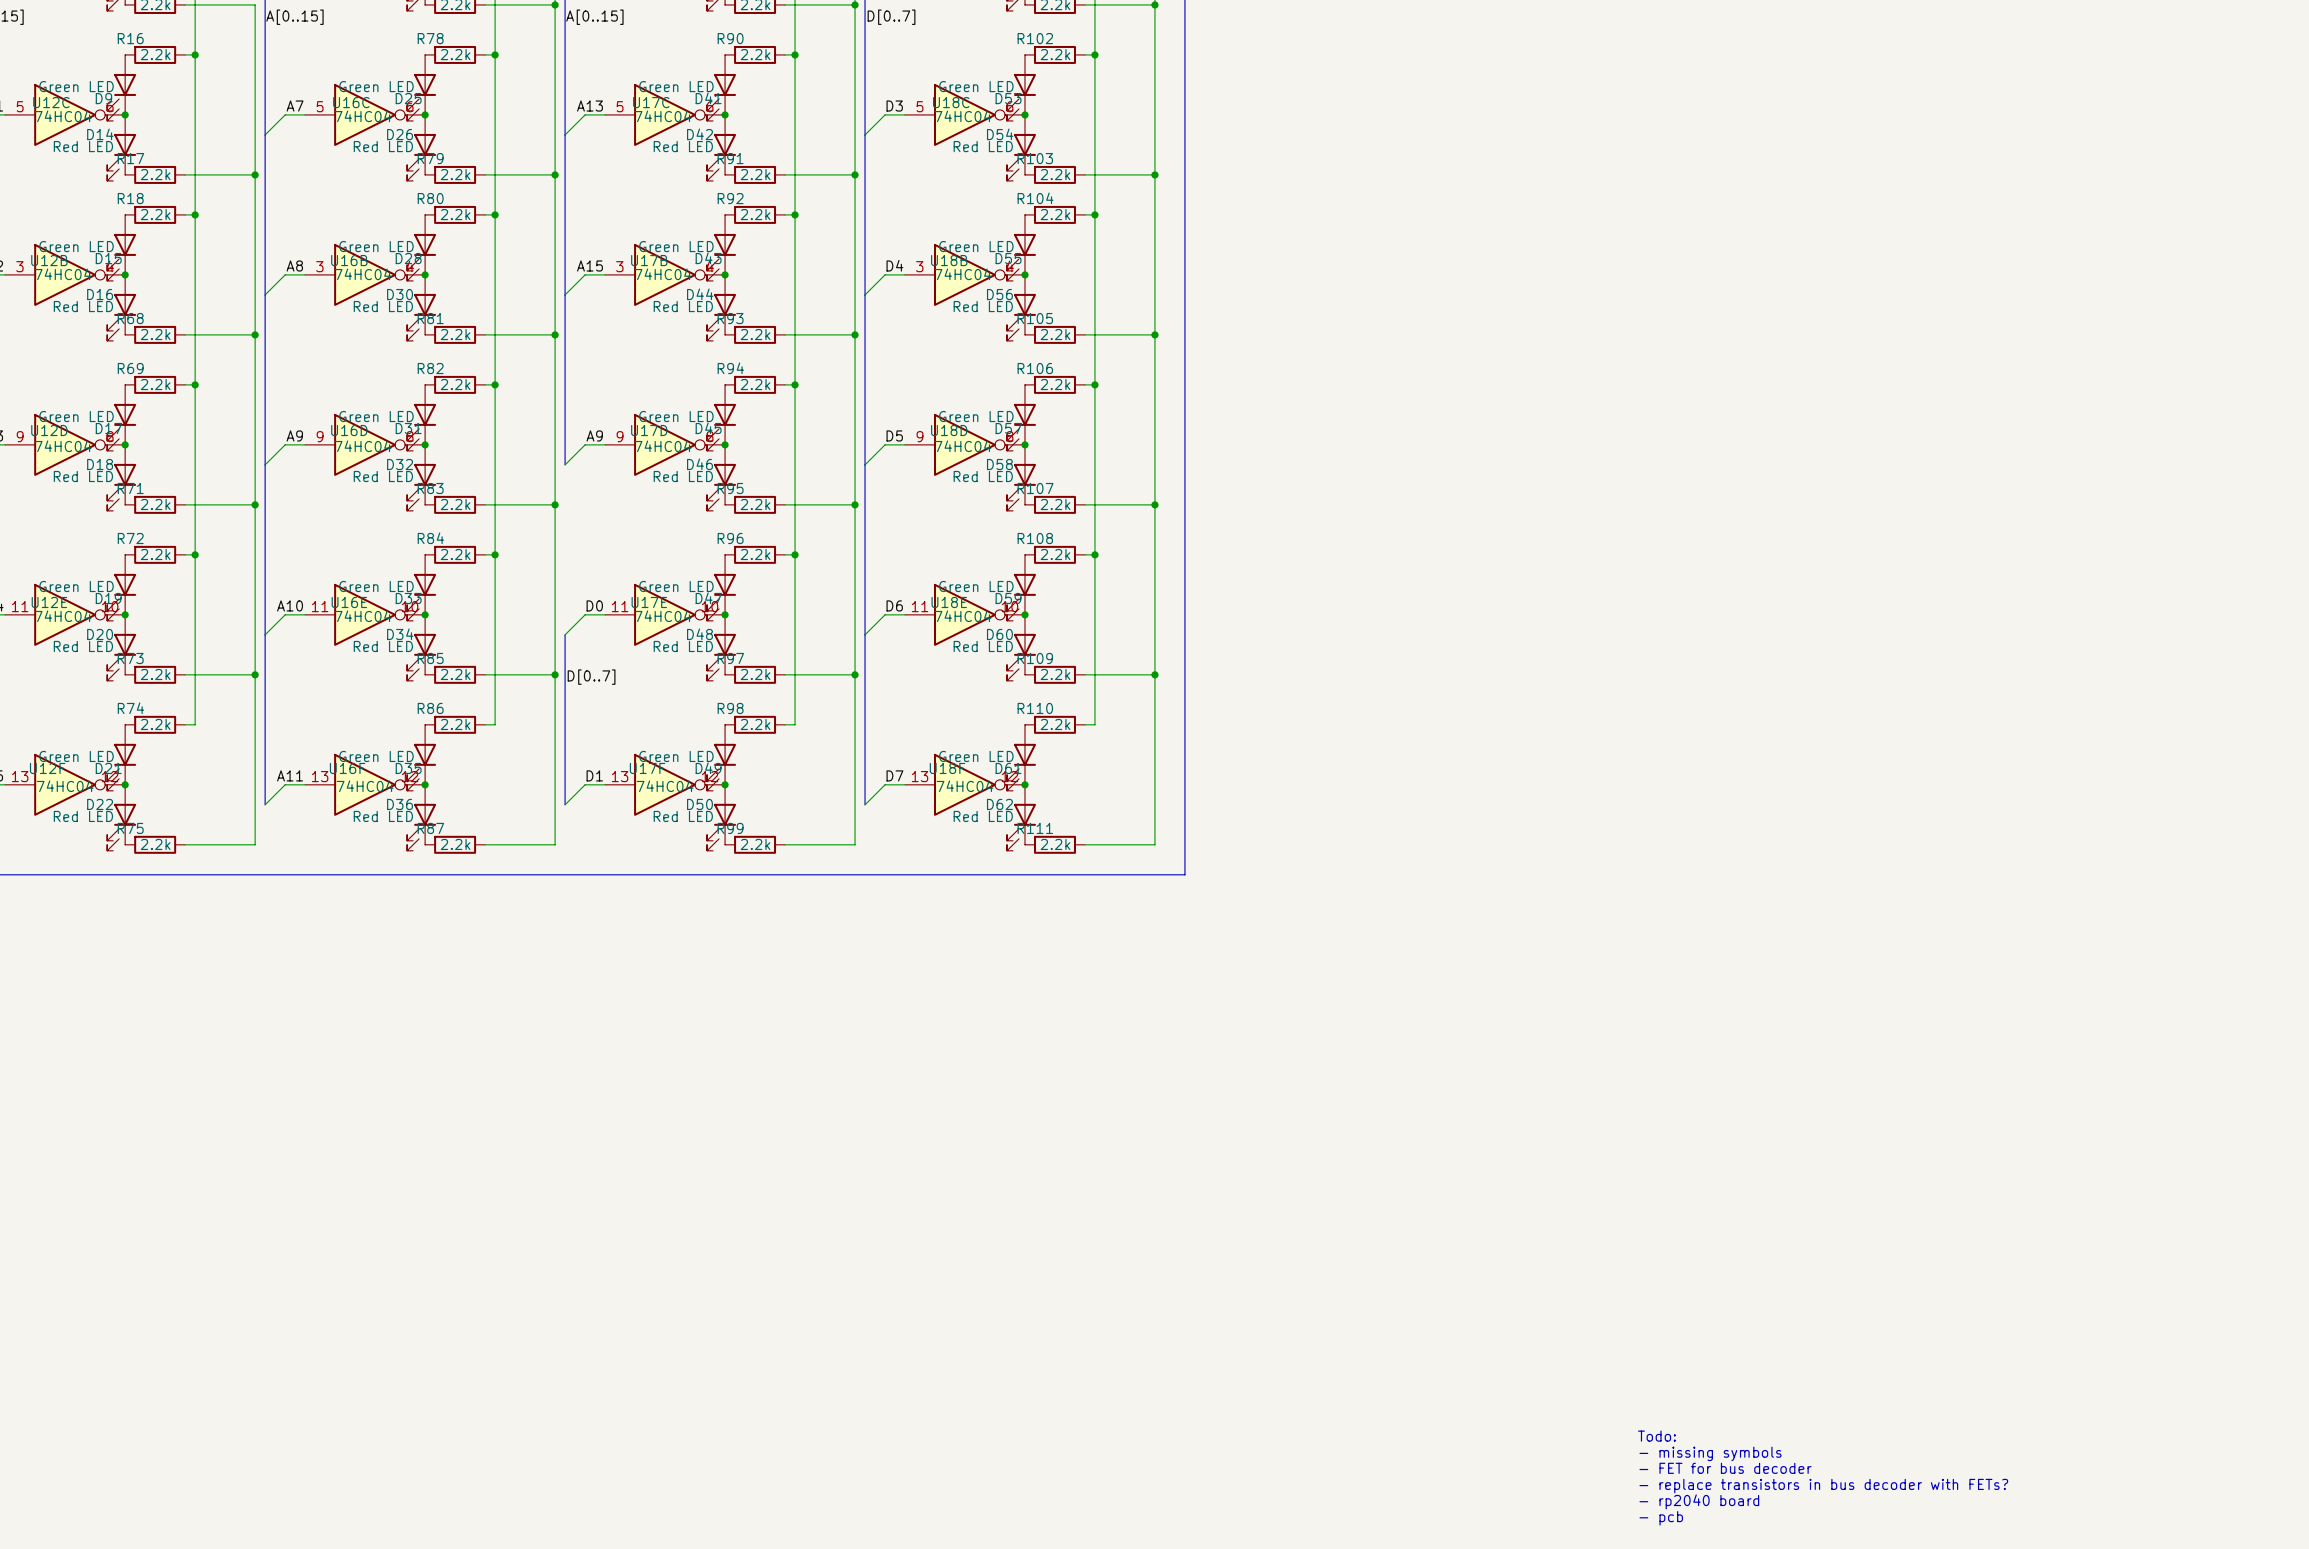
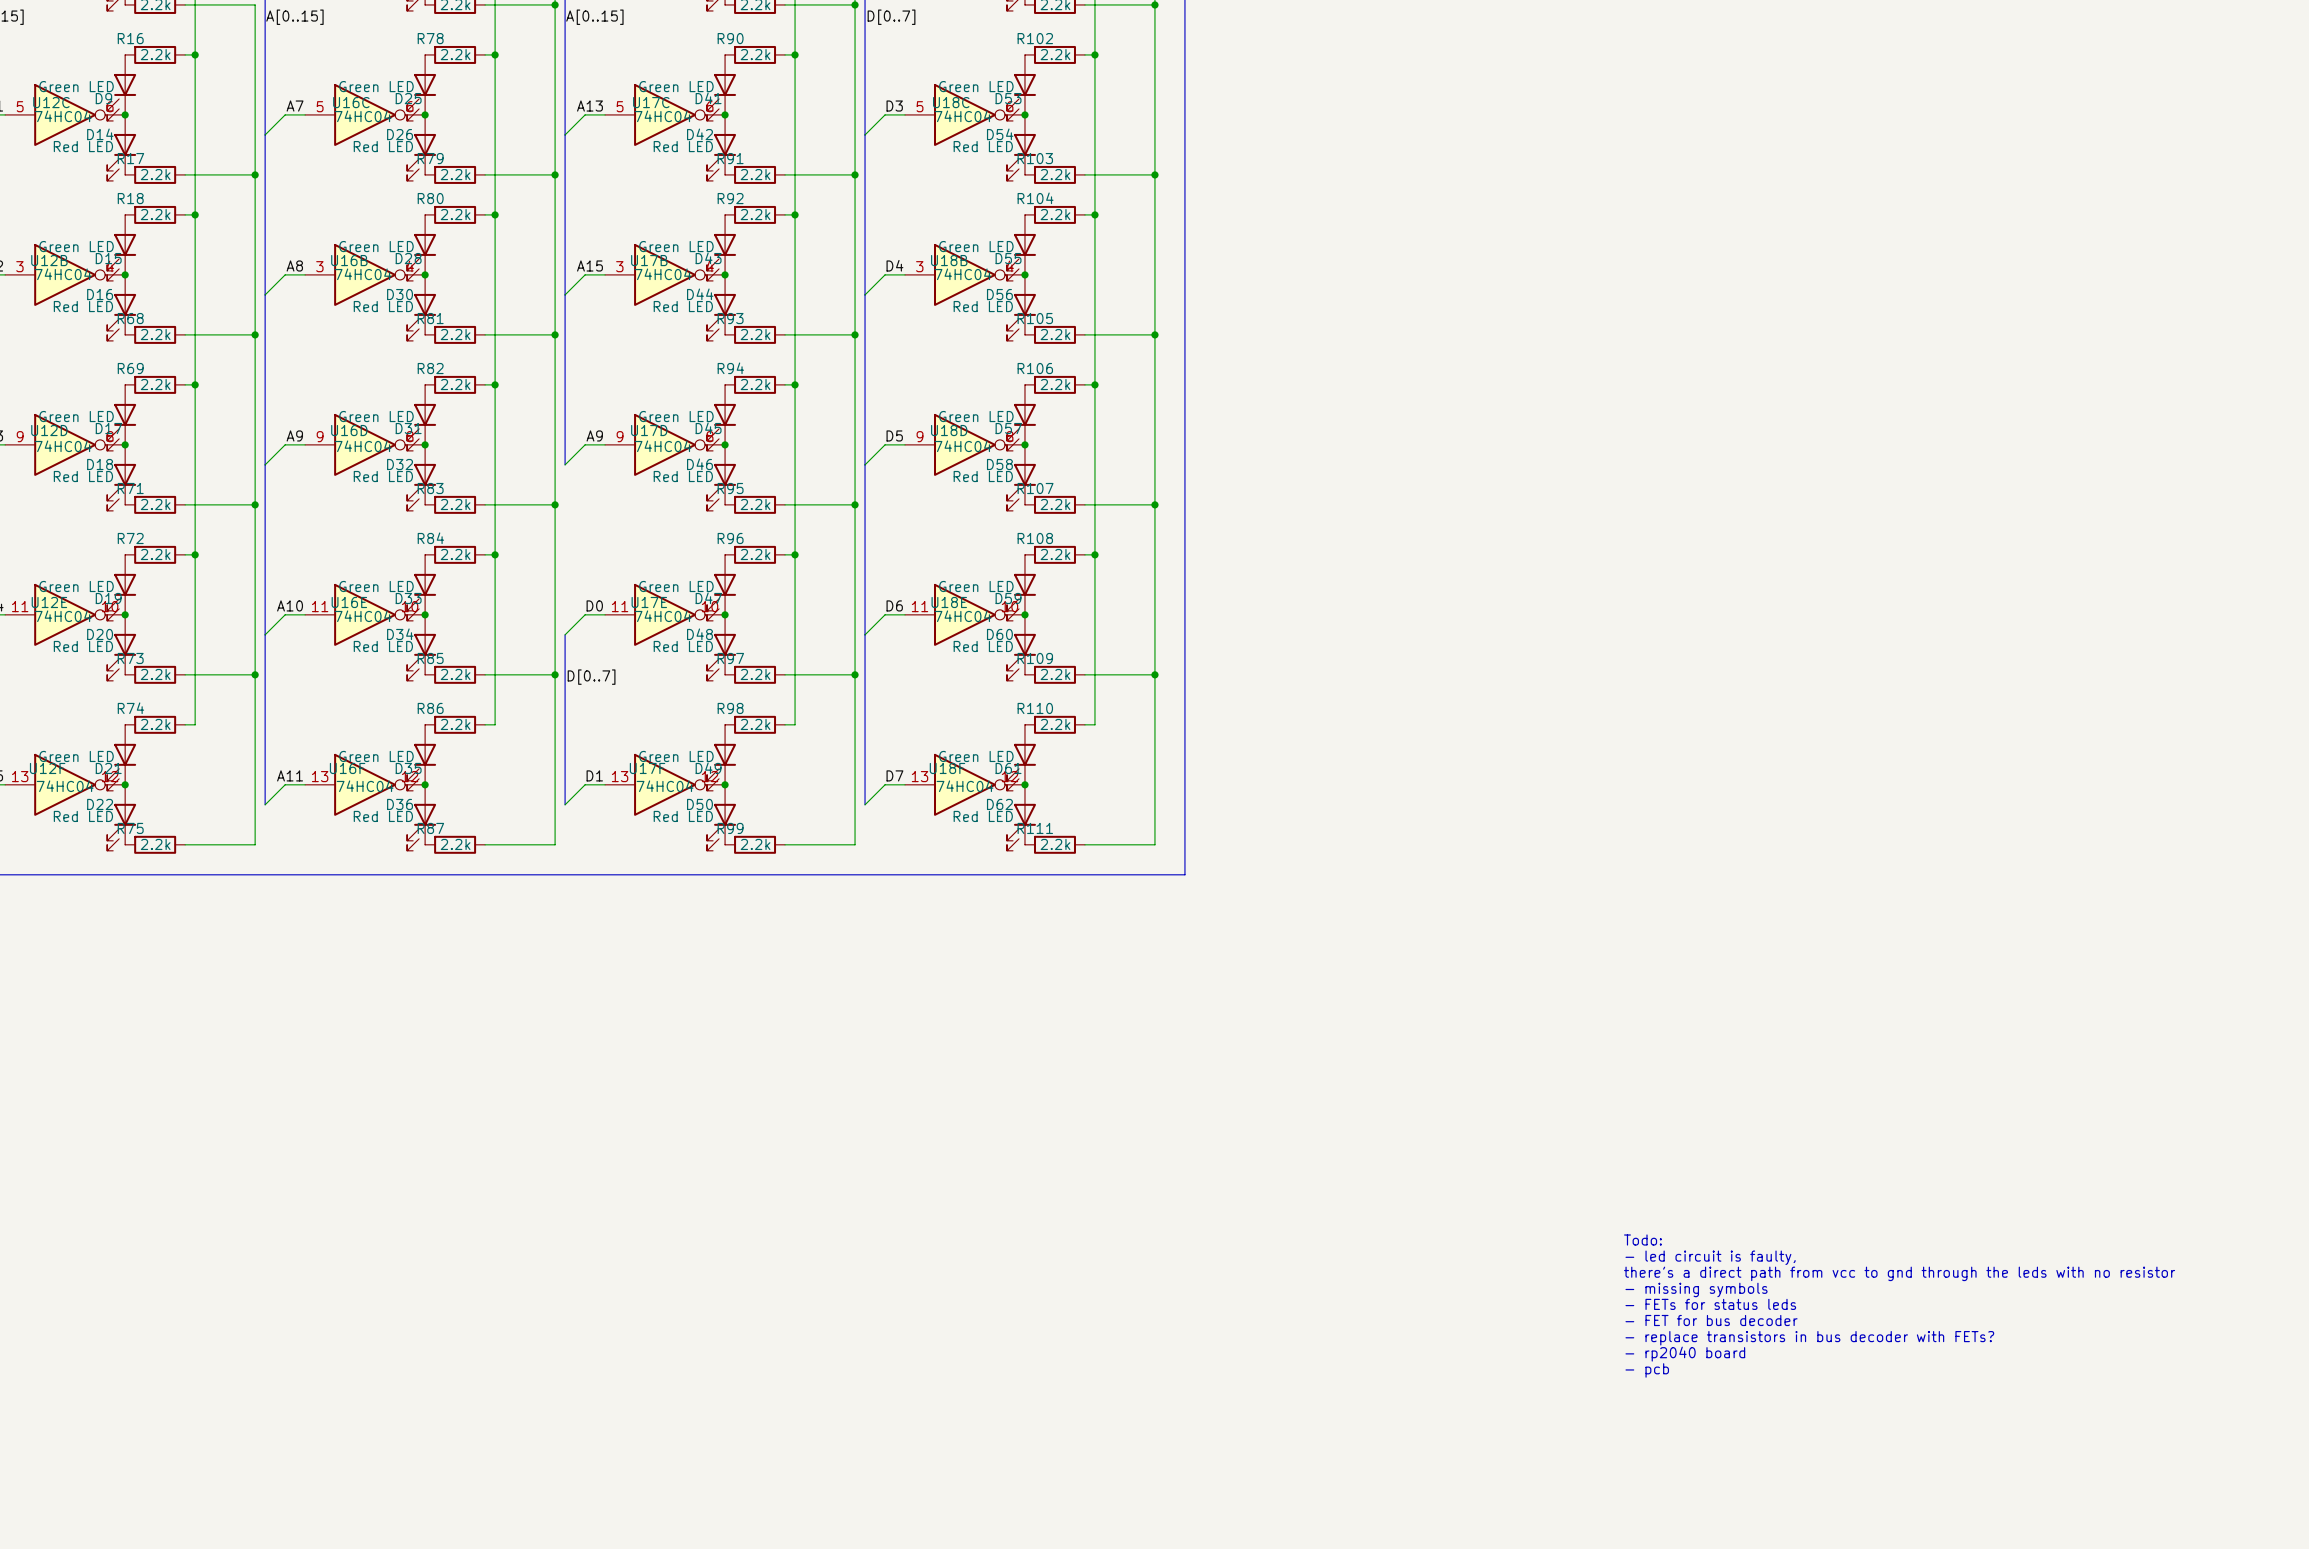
text: none -> - led circuit is faulty, (1710, 1257)
text: none -> there's a direct path from vcc to gnd through the leds with no resistor (1899, 1273)
text: none -> - FETs for status leds (1710, 1304)
text position: Todo: (1656, 1436) -> Todo: (1642, 1240)
text position: - missing symbols (1710, 1453) -> - missing symbols (1696, 1289)
text position: - FET for bus decoder (1725, 1468) -> - FET for bus decoder (1711, 1320)
text position: - replace transistors in bus decoder with FETs? (1823, 1486) -> - replace transistors in bus decoder with FETs? (1809, 1338)
text position: - rp2040 board (1699, 1501) -> - rp2040 board (1685, 1354)
text position: - pcb (1661, 1518) -> - pcb (1647, 1370)

